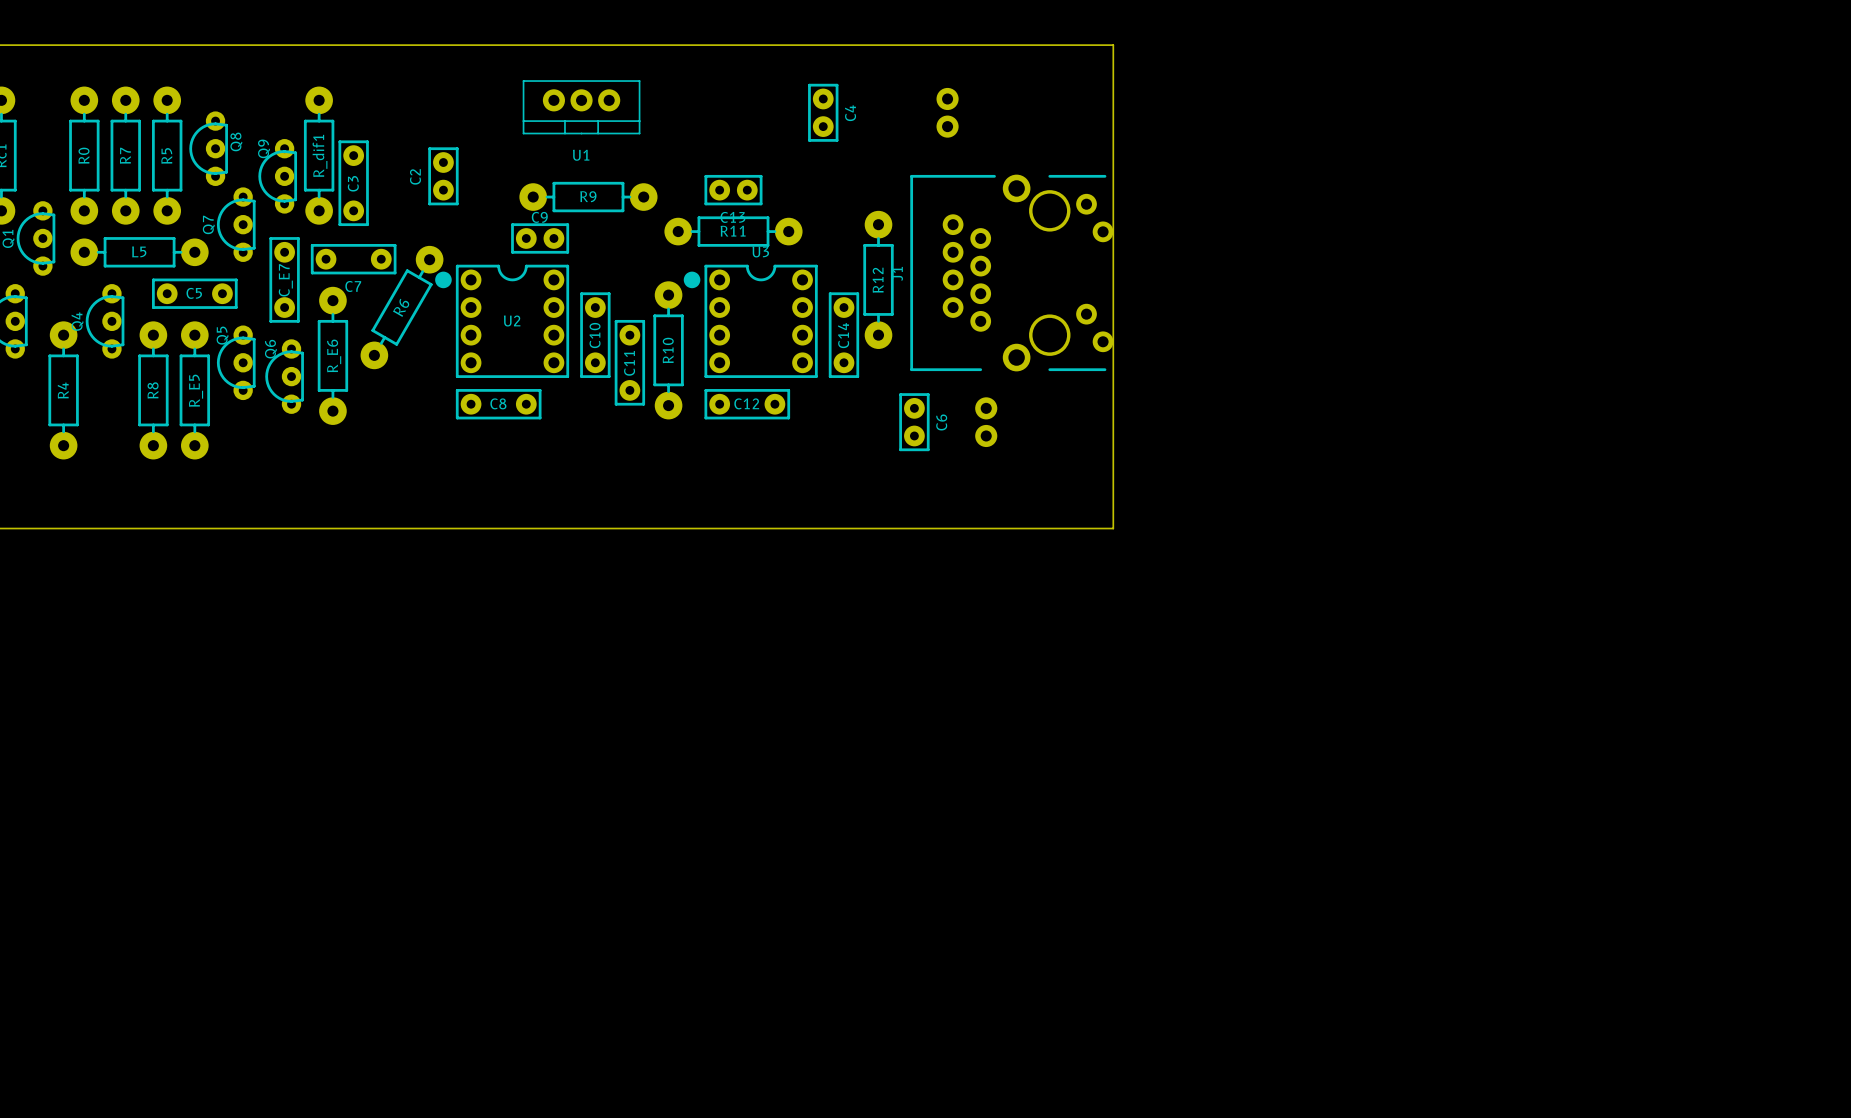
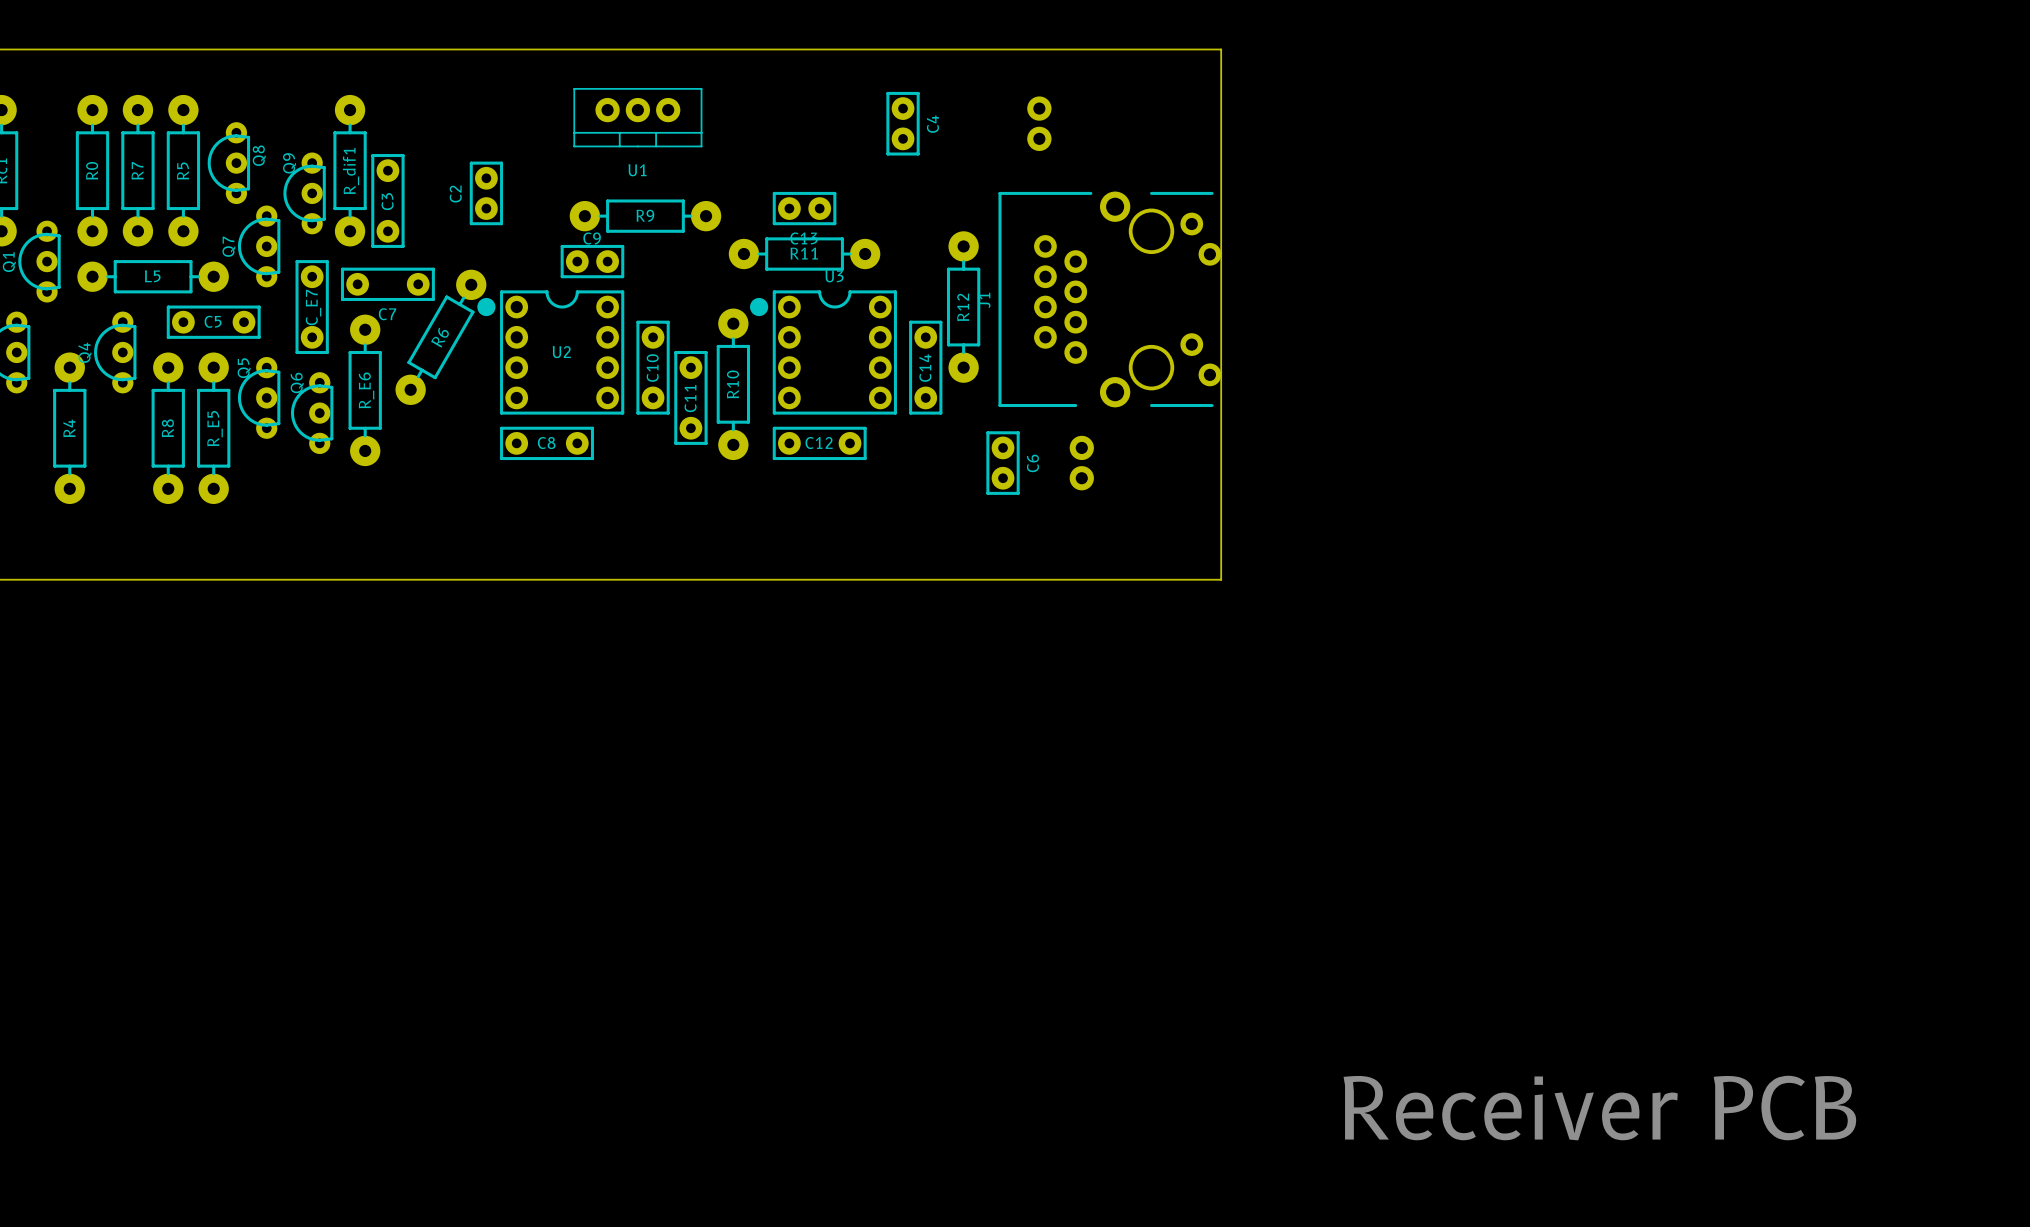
text: none -> Receiver PCB (1599, 1108)

